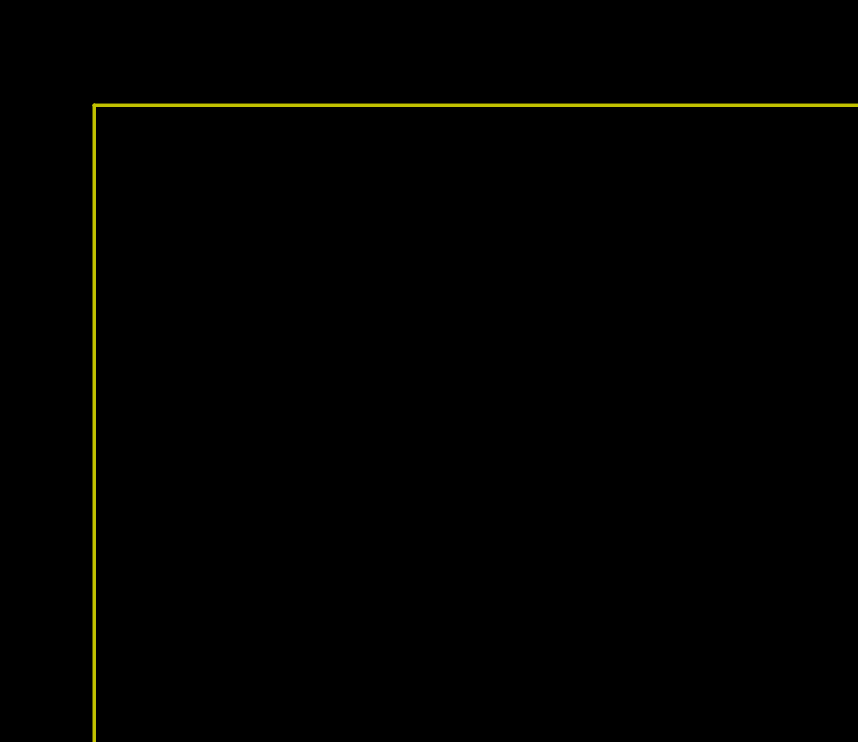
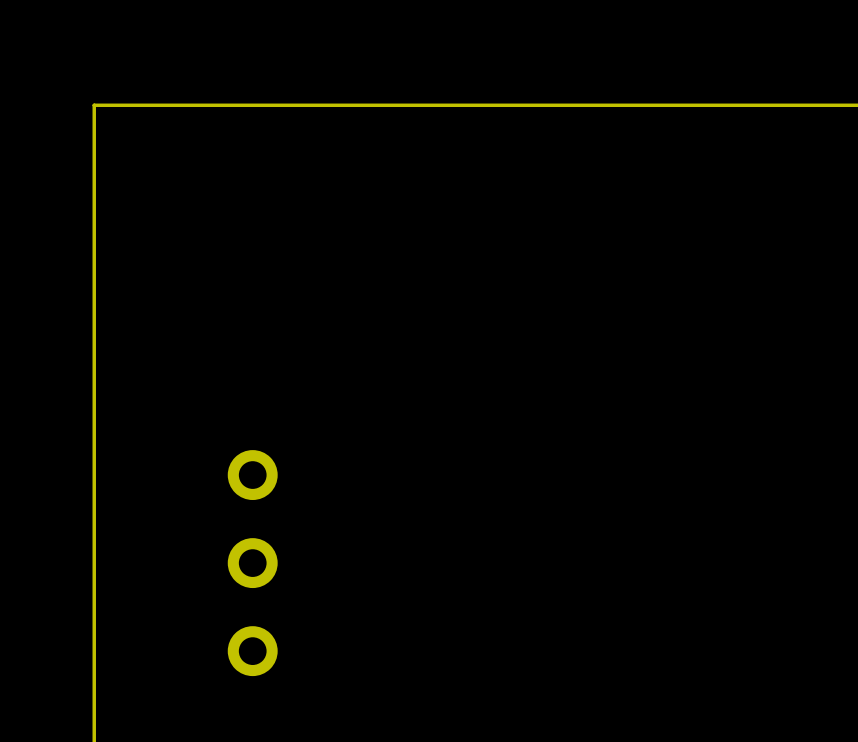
part: none -> (252, 563)

